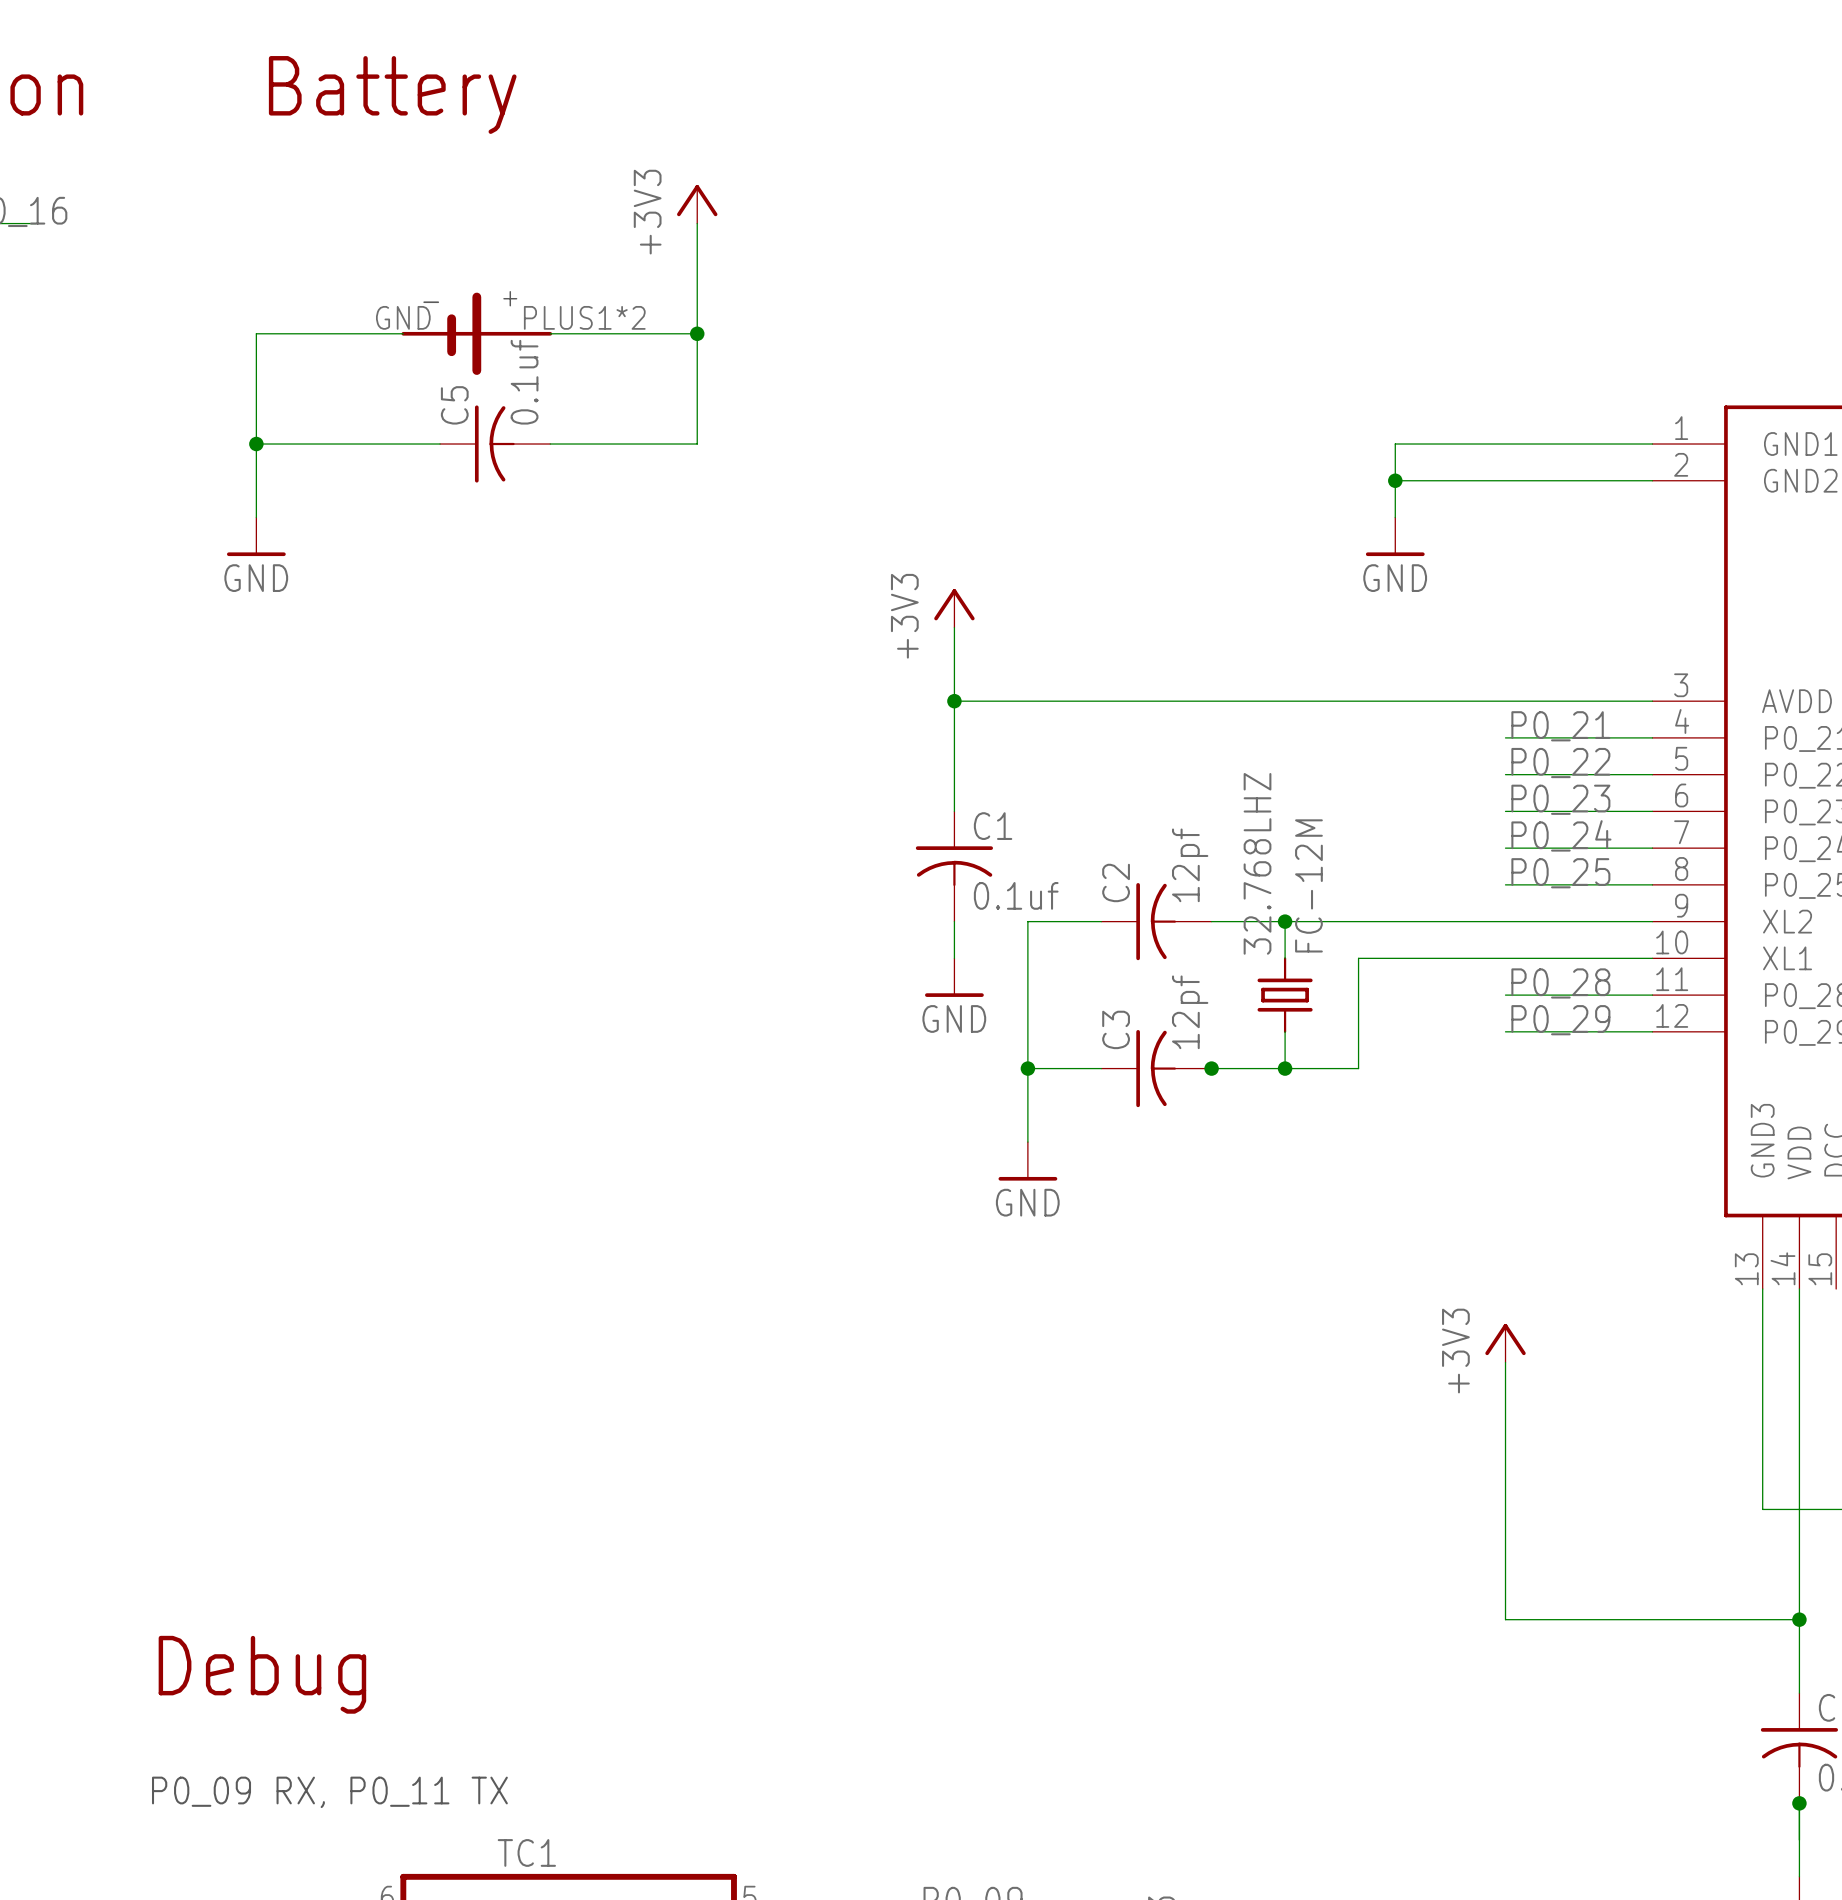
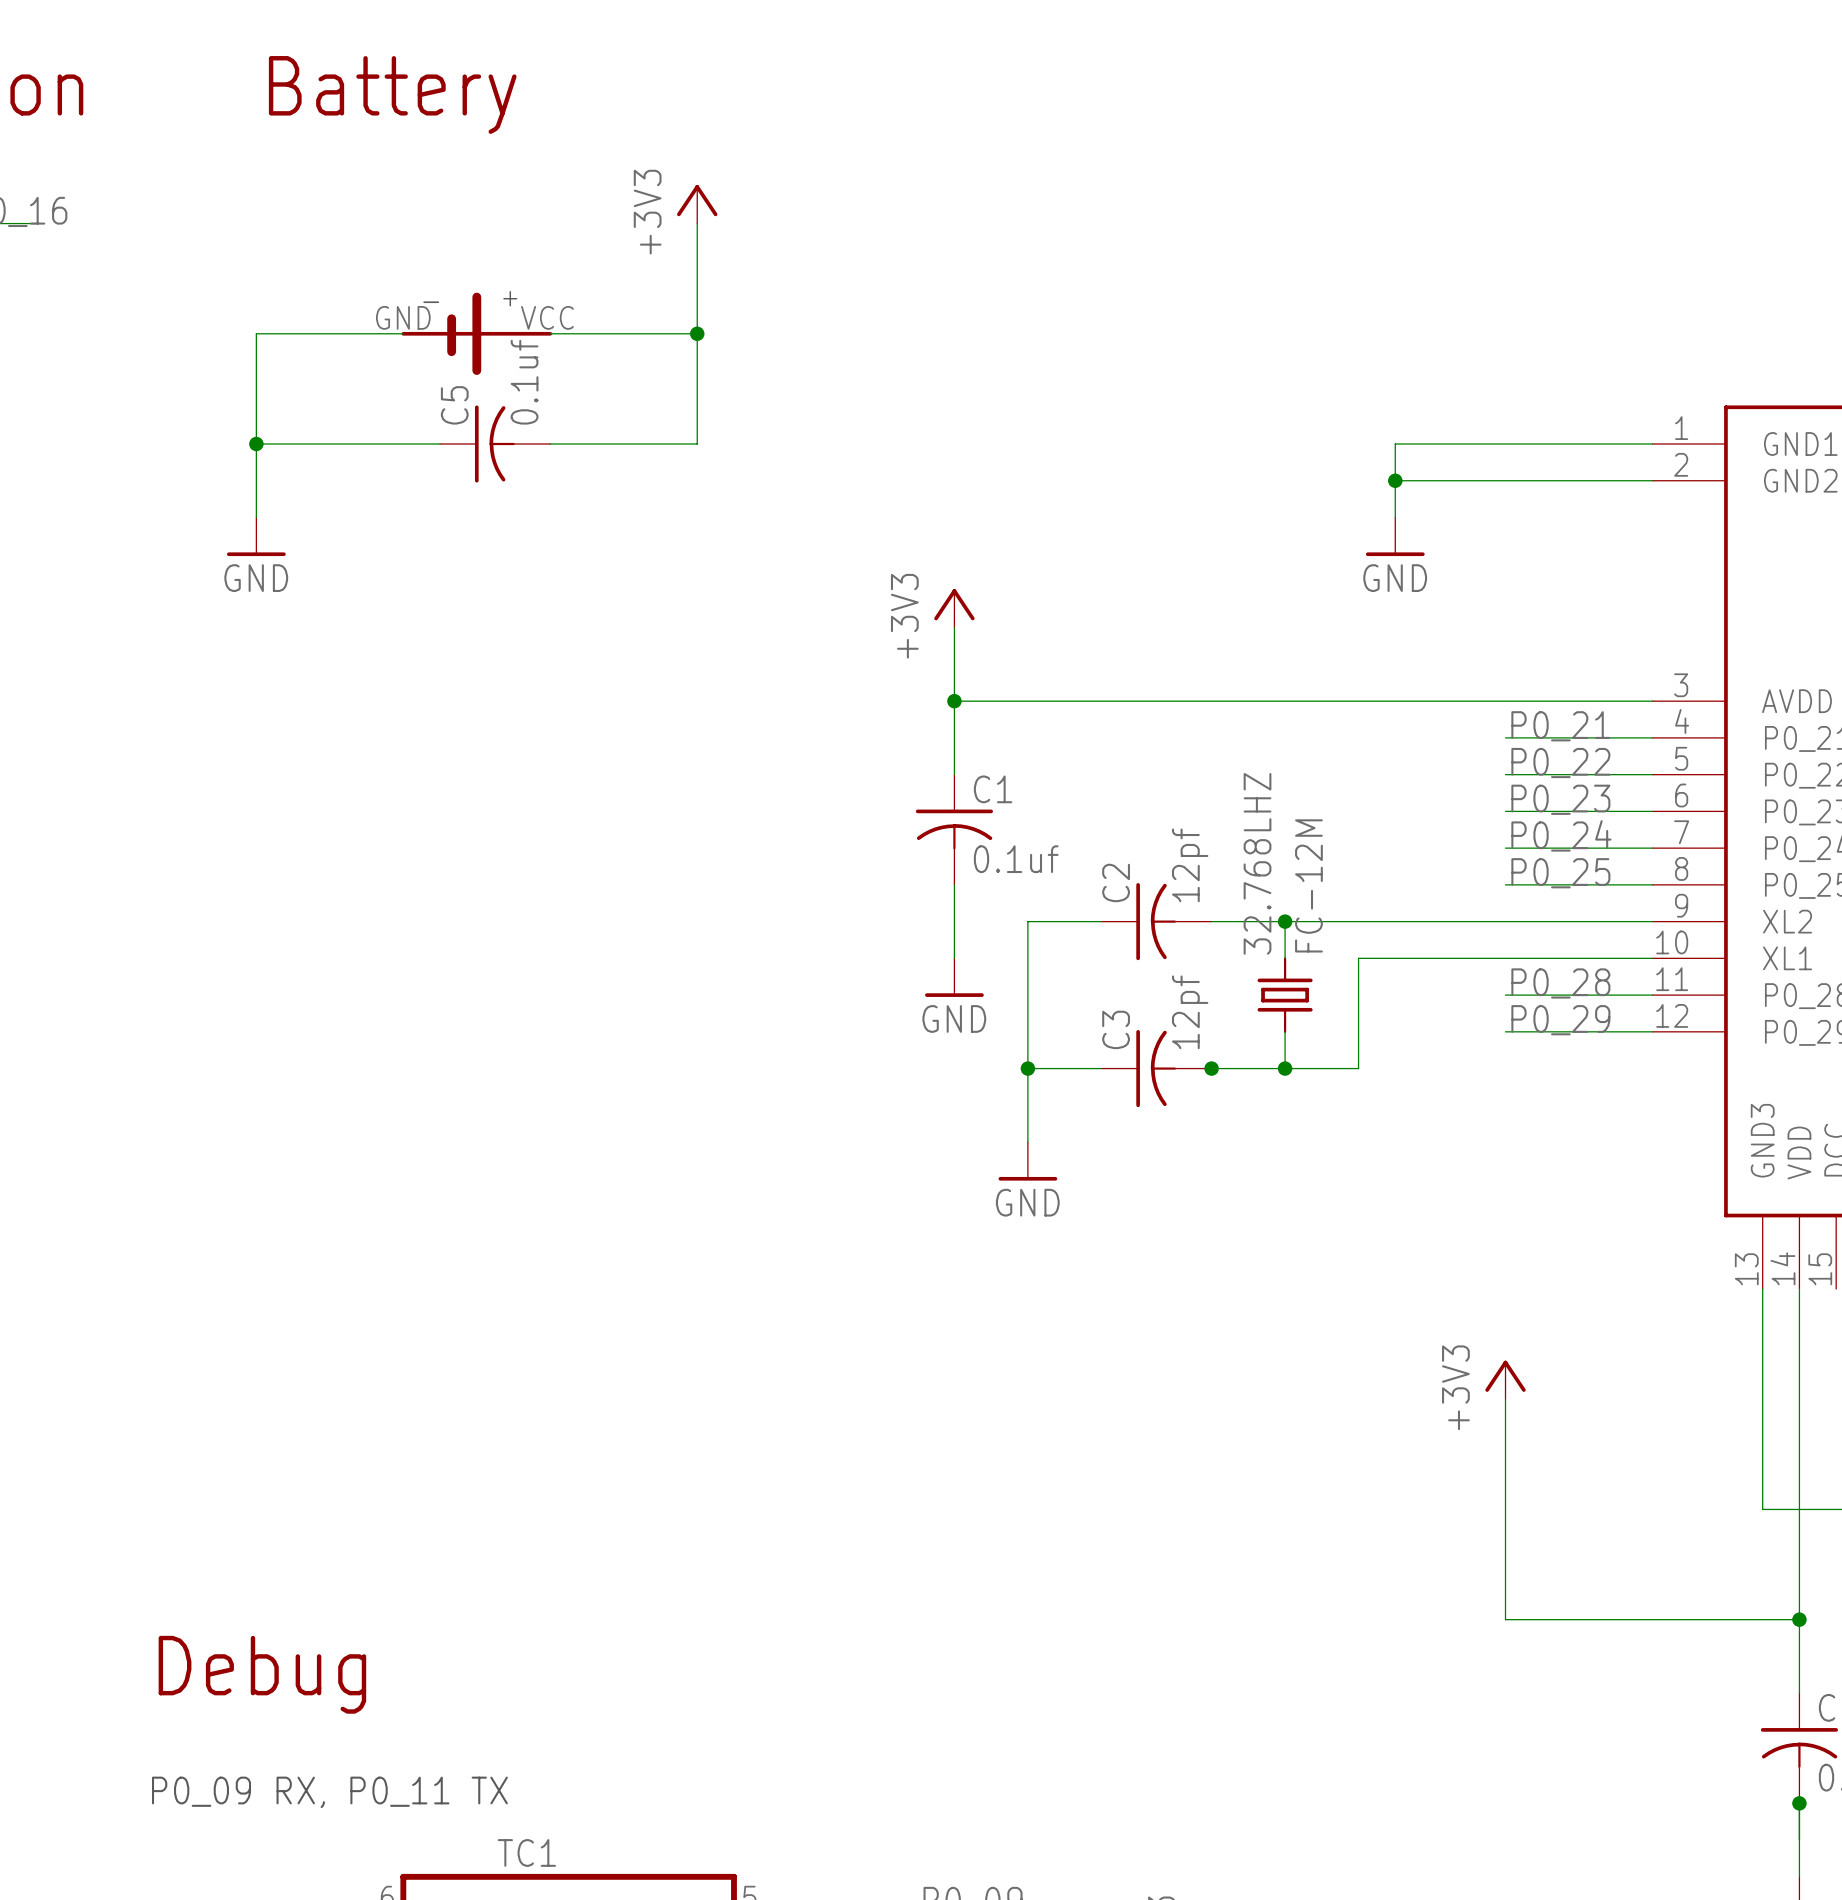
part pin number: PLUS1*2 (584, 317) -> VCC (547, 317)
C1 position: (954, 866) -> (954, 829)
power symbol position: +3V3 (1505, 1343) -> +3V3 (1505, 1379)

